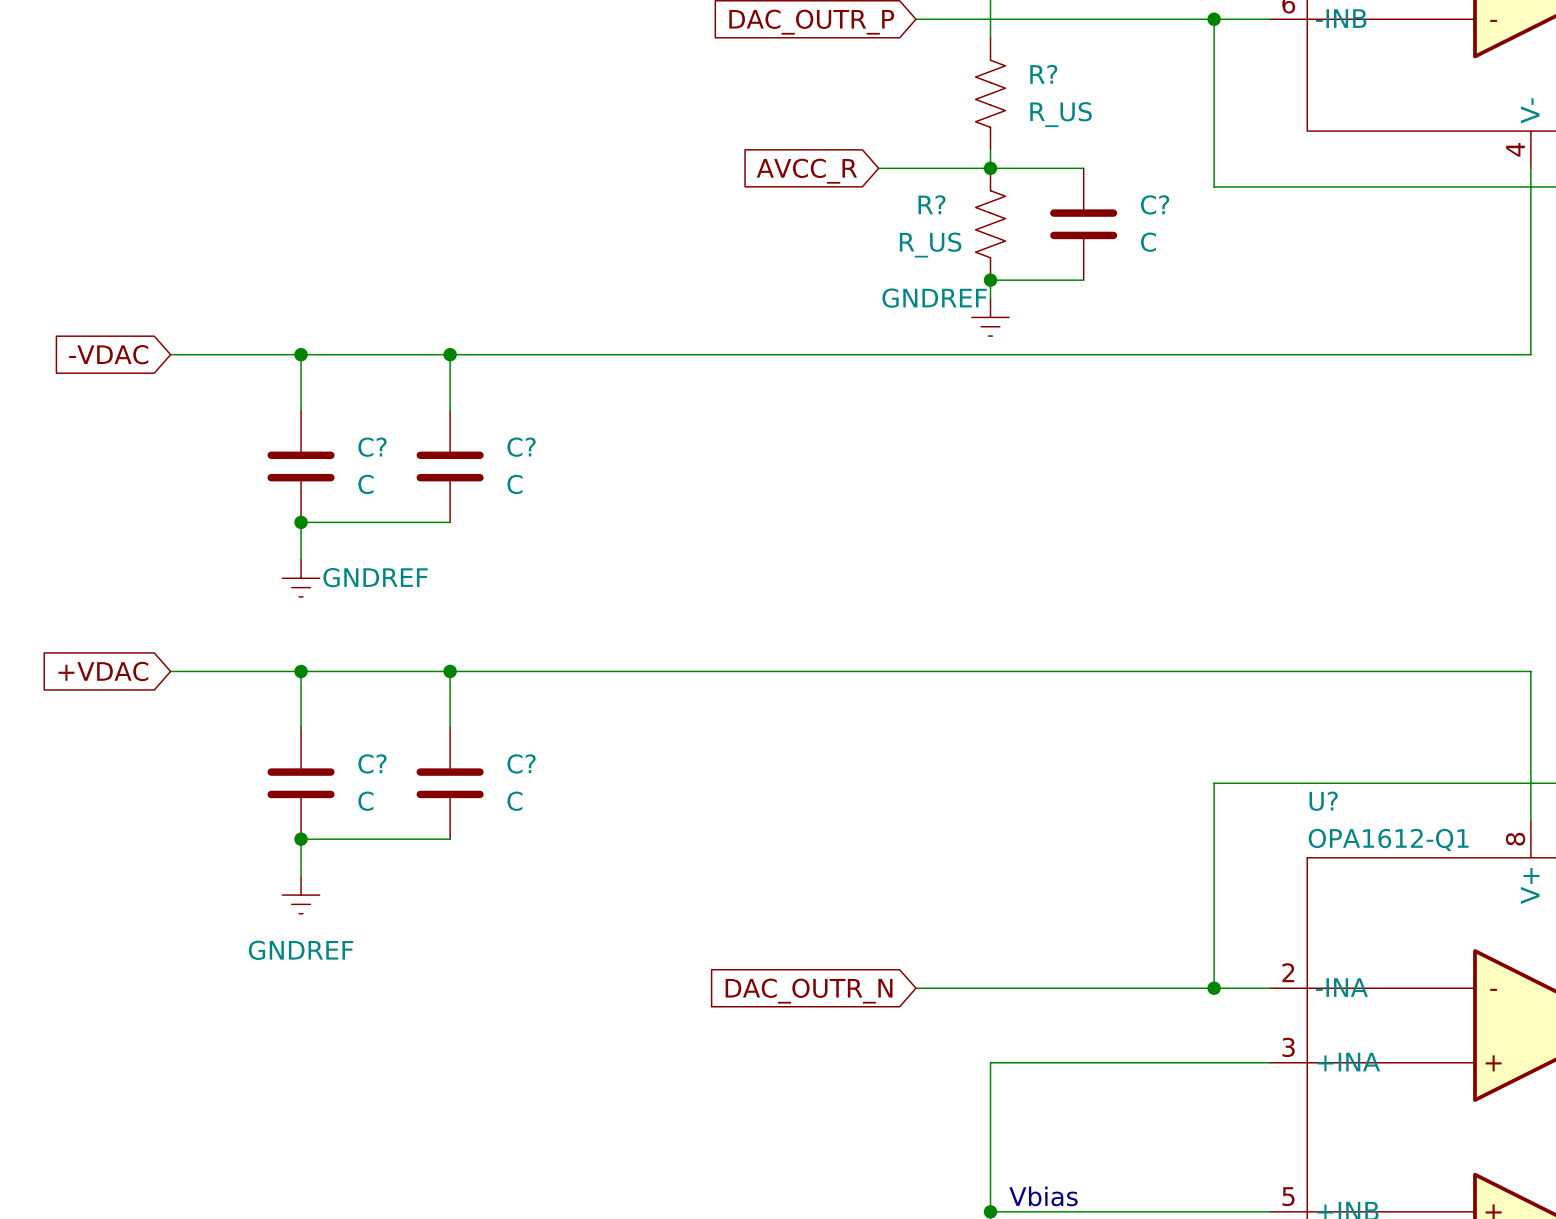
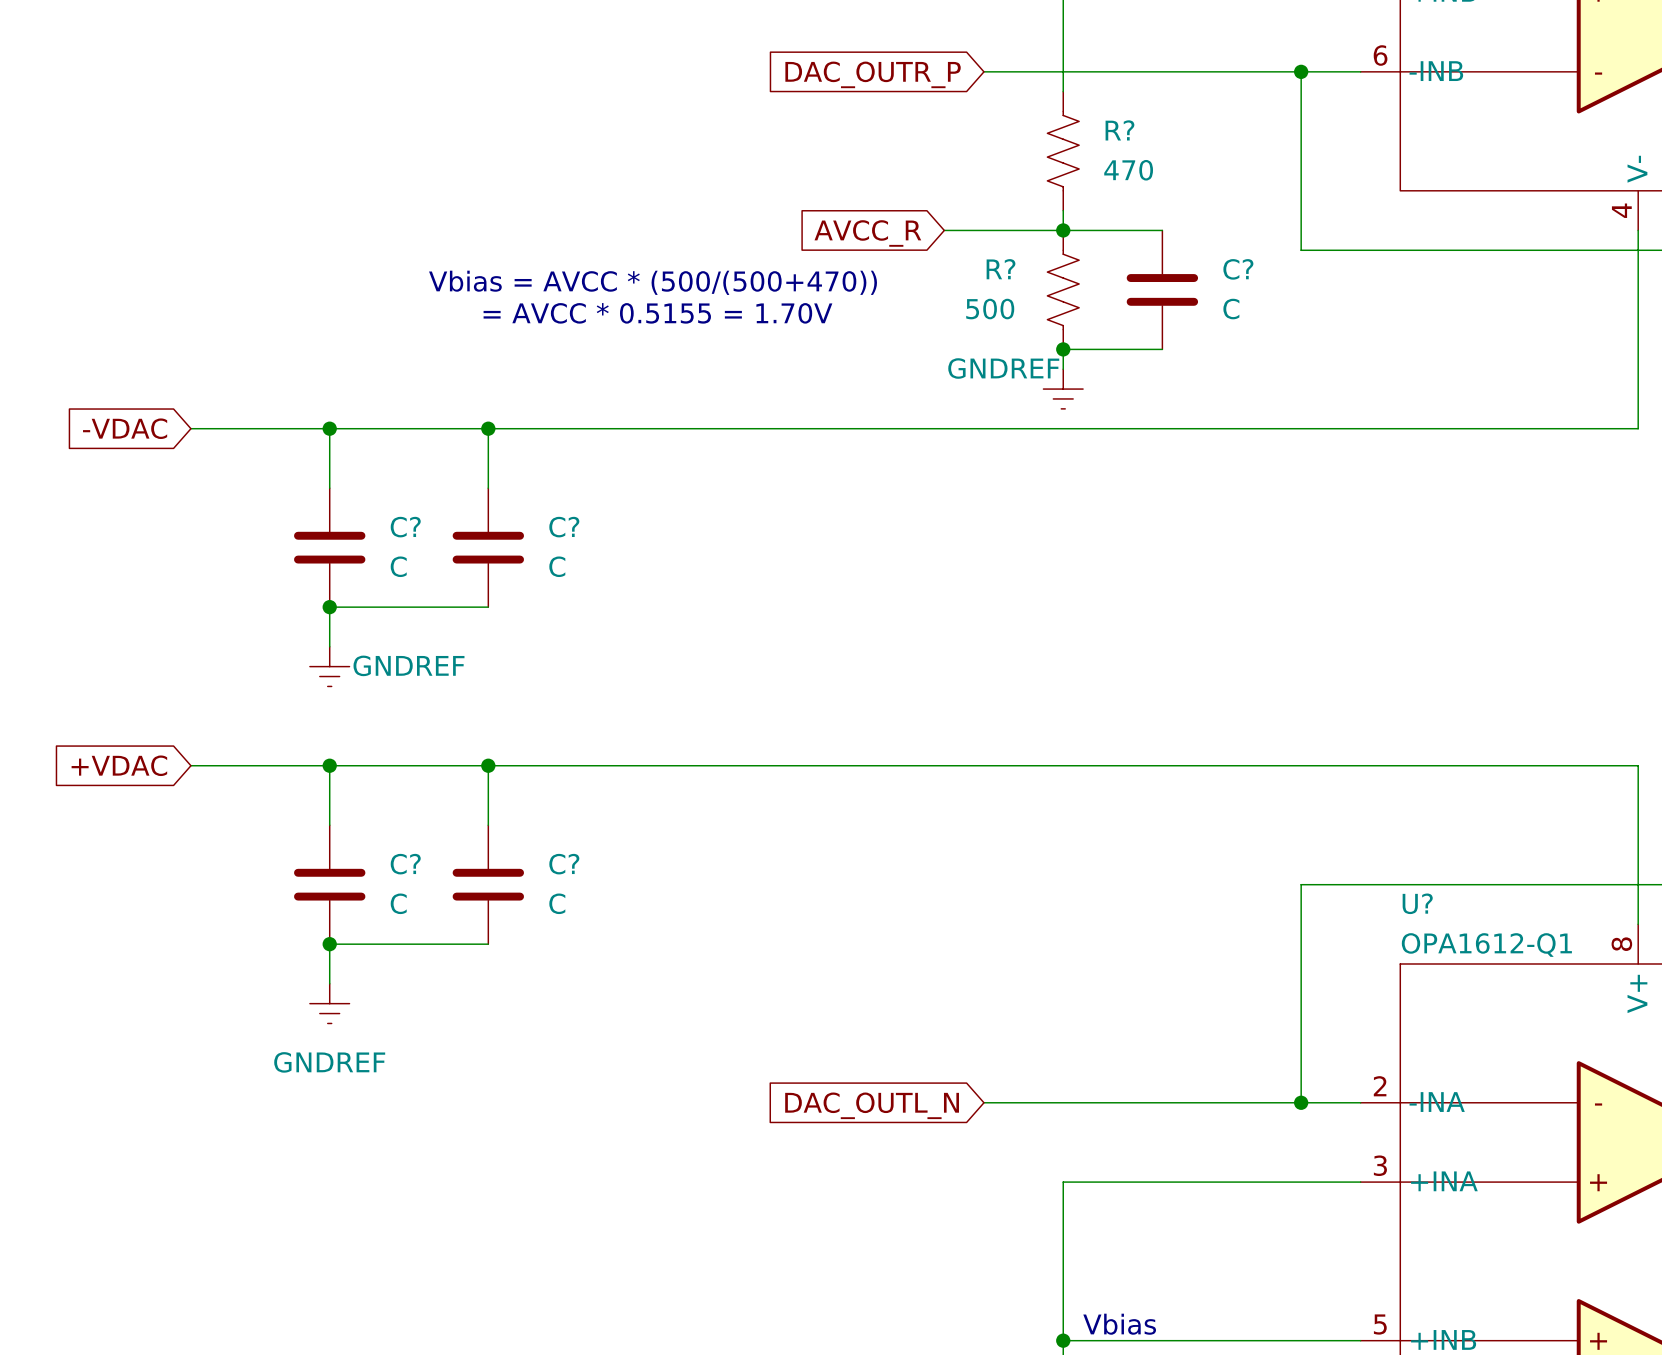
R? value: R_US (1061, 114) -> 470 (1128, 170)
text: none -> Vbias = AVCC * (500/(500+470)) (653, 282)
R? value: R_US (930, 245) -> 500 (990, 309)
text: none -> = AVCC * 0.5155 = 1.70V (657, 313)
global label: DAC_OUTR_N (809, 991) -> DAC_OUTL_N (872, 1105)

